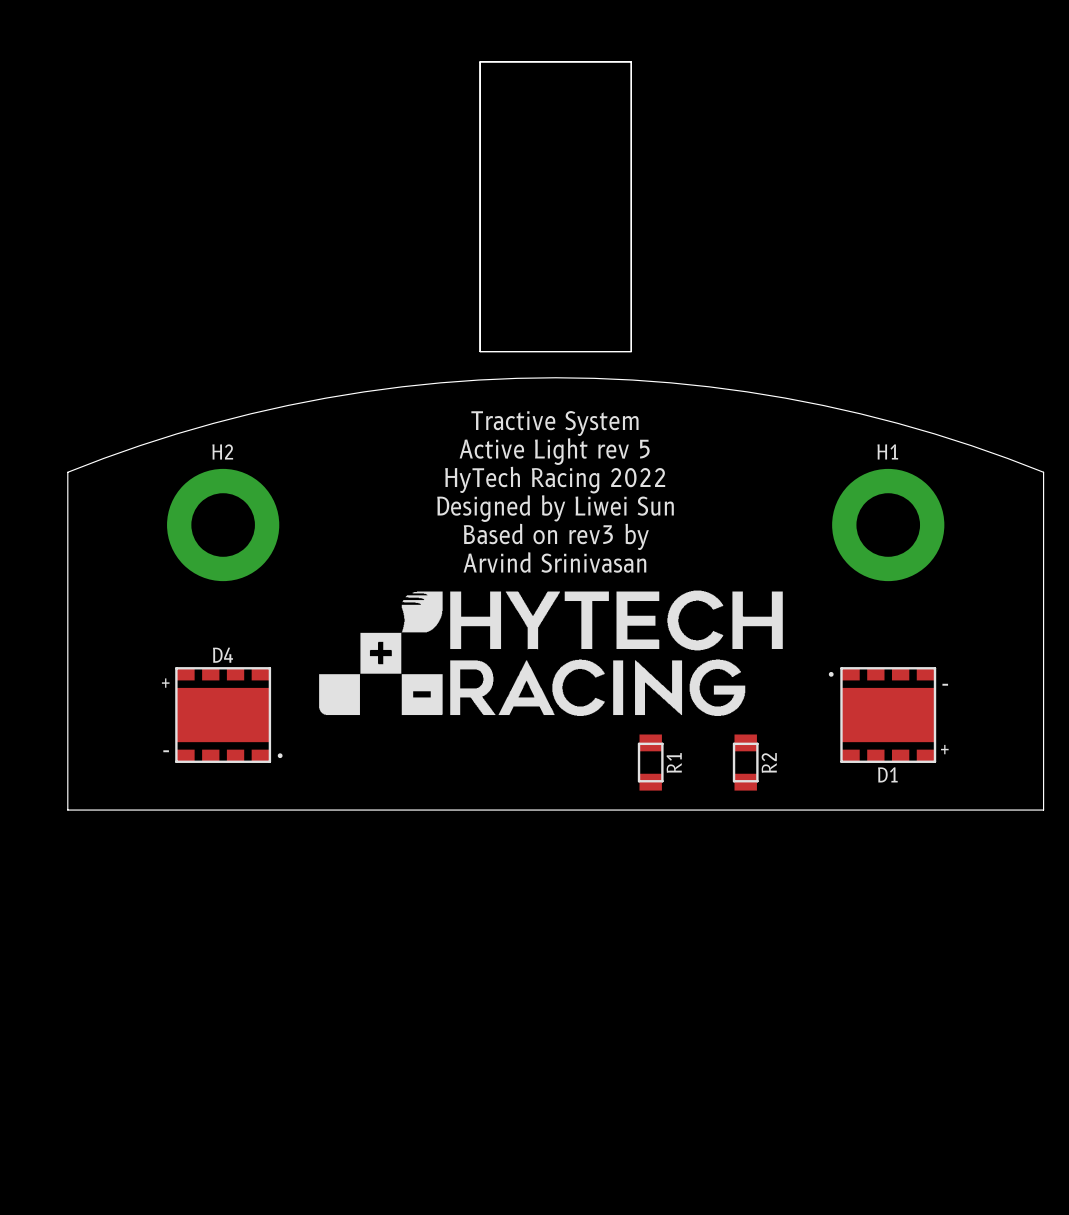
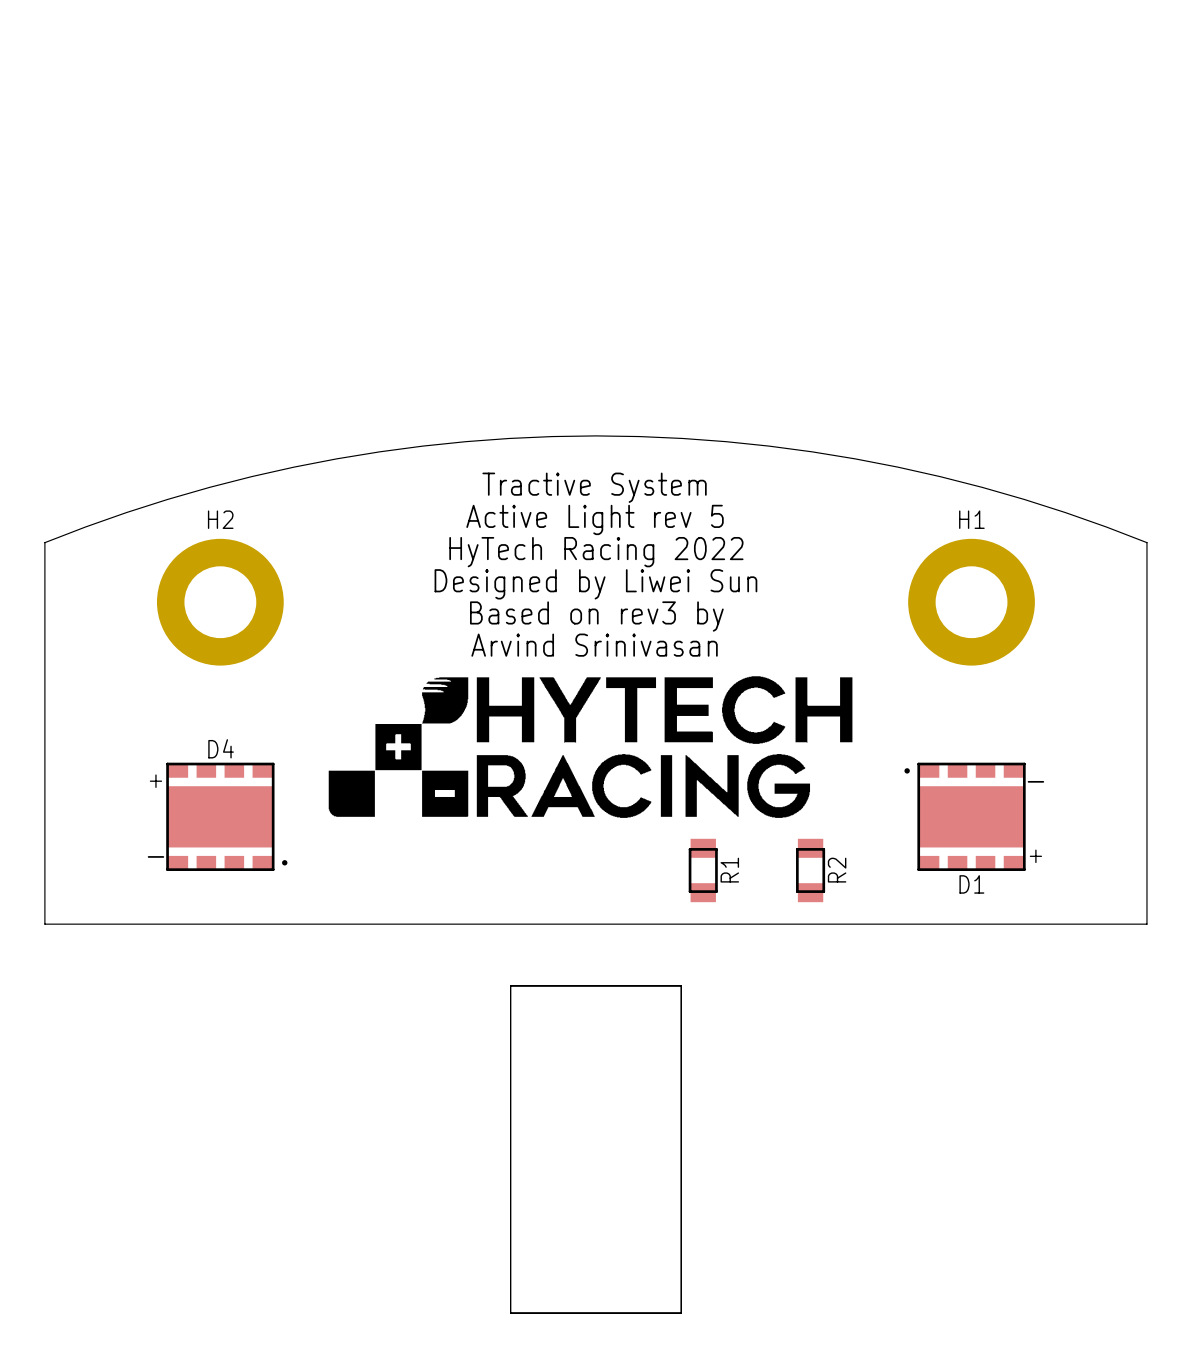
part: (555, 206) -> none
part: none -> (595, 1149)

